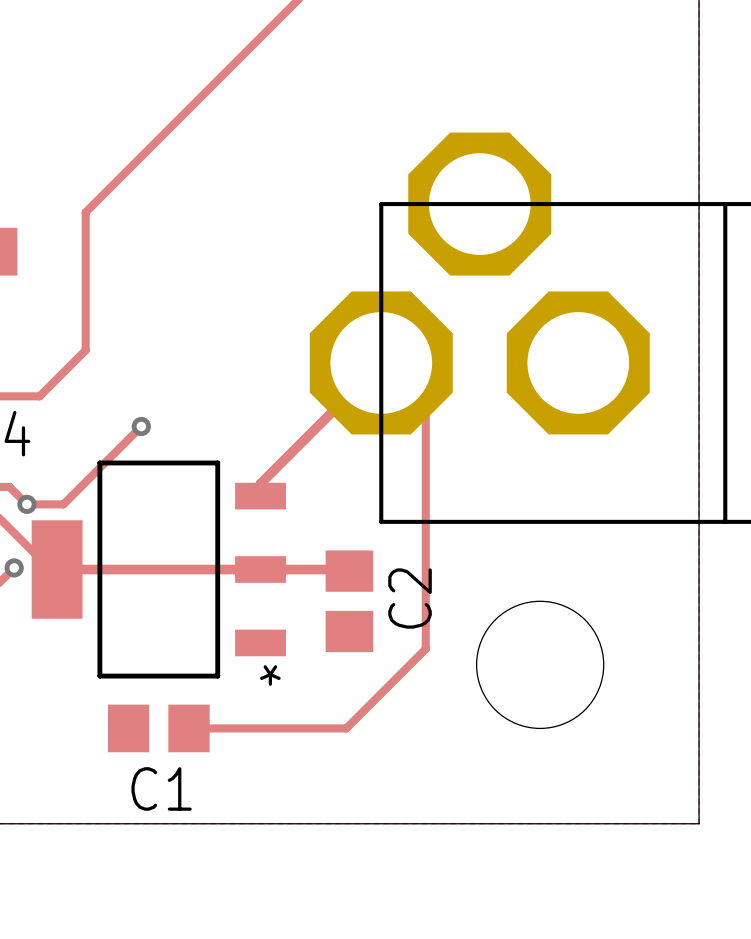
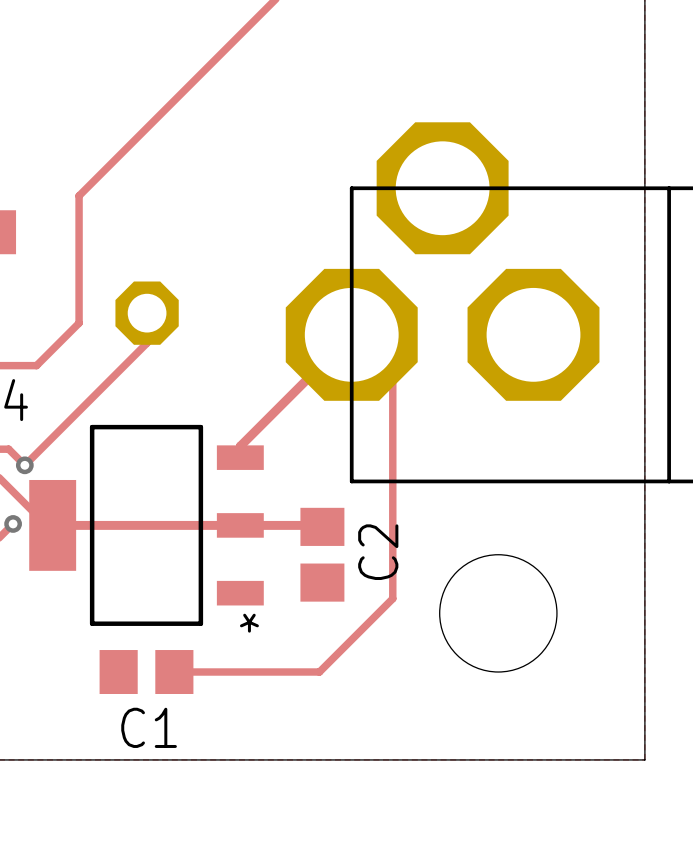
part: none -> (147, 313)
track: (141, 426) (63, 504) (26, 504) -> (147, 313) (147, 343) (24, 465)
via: (141, 426) -> none

